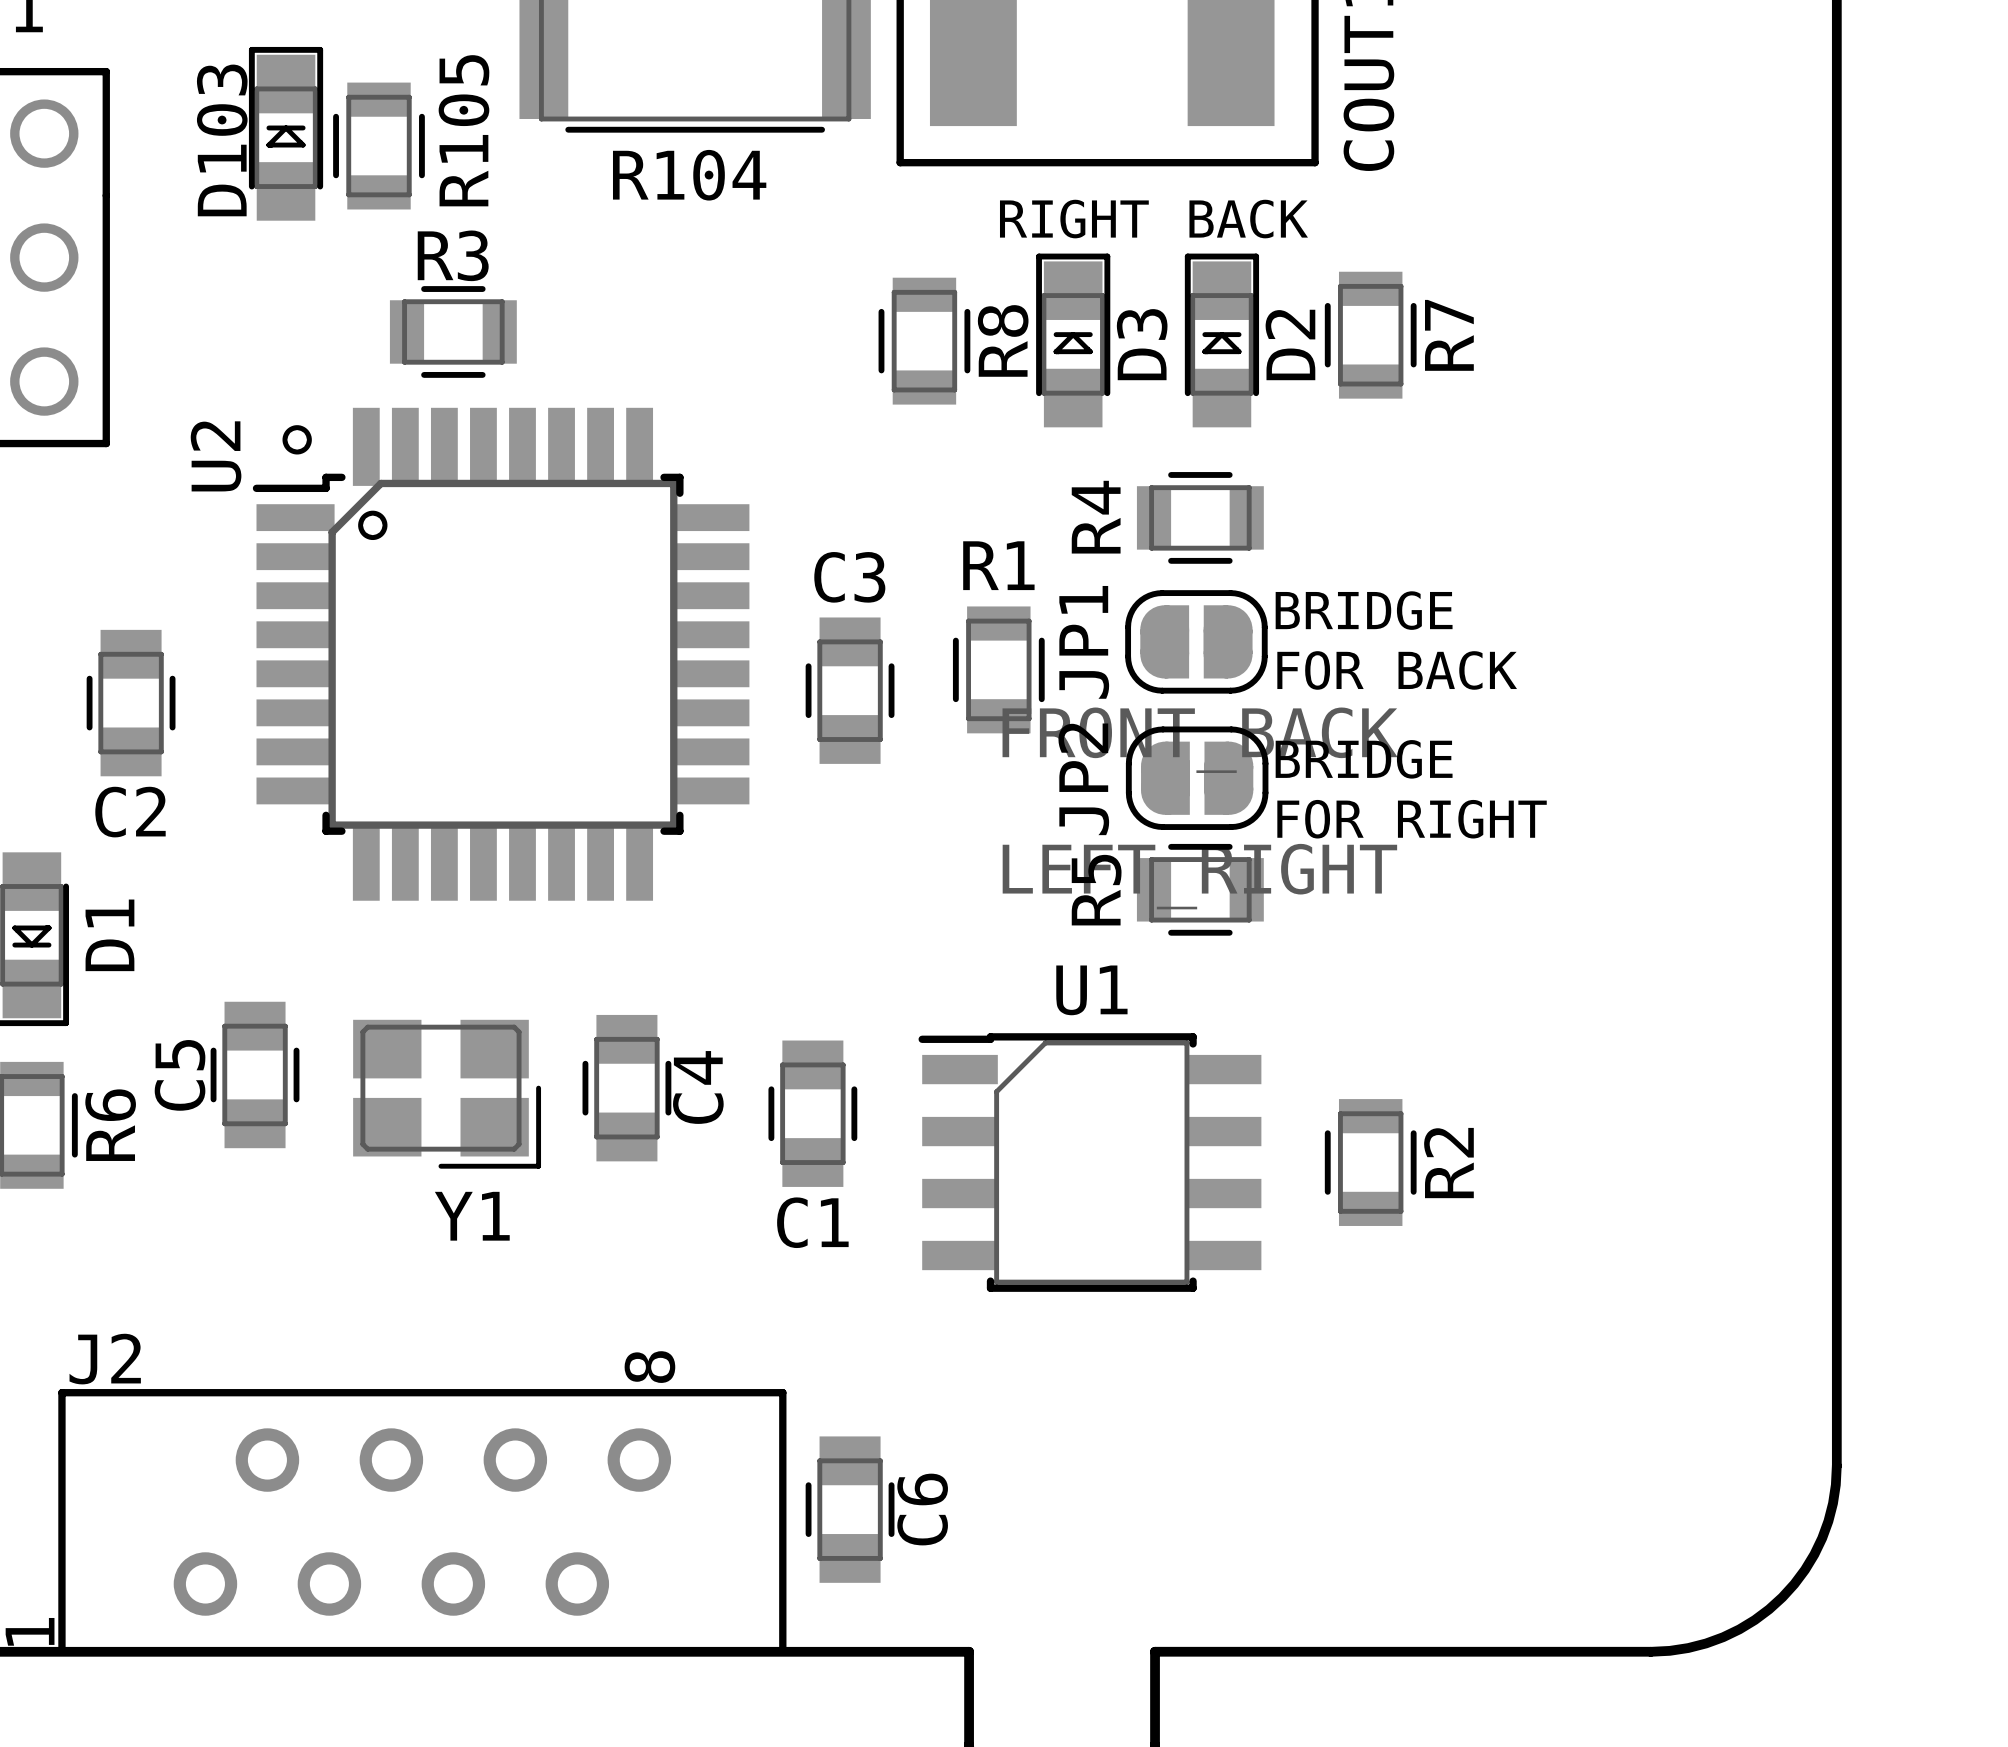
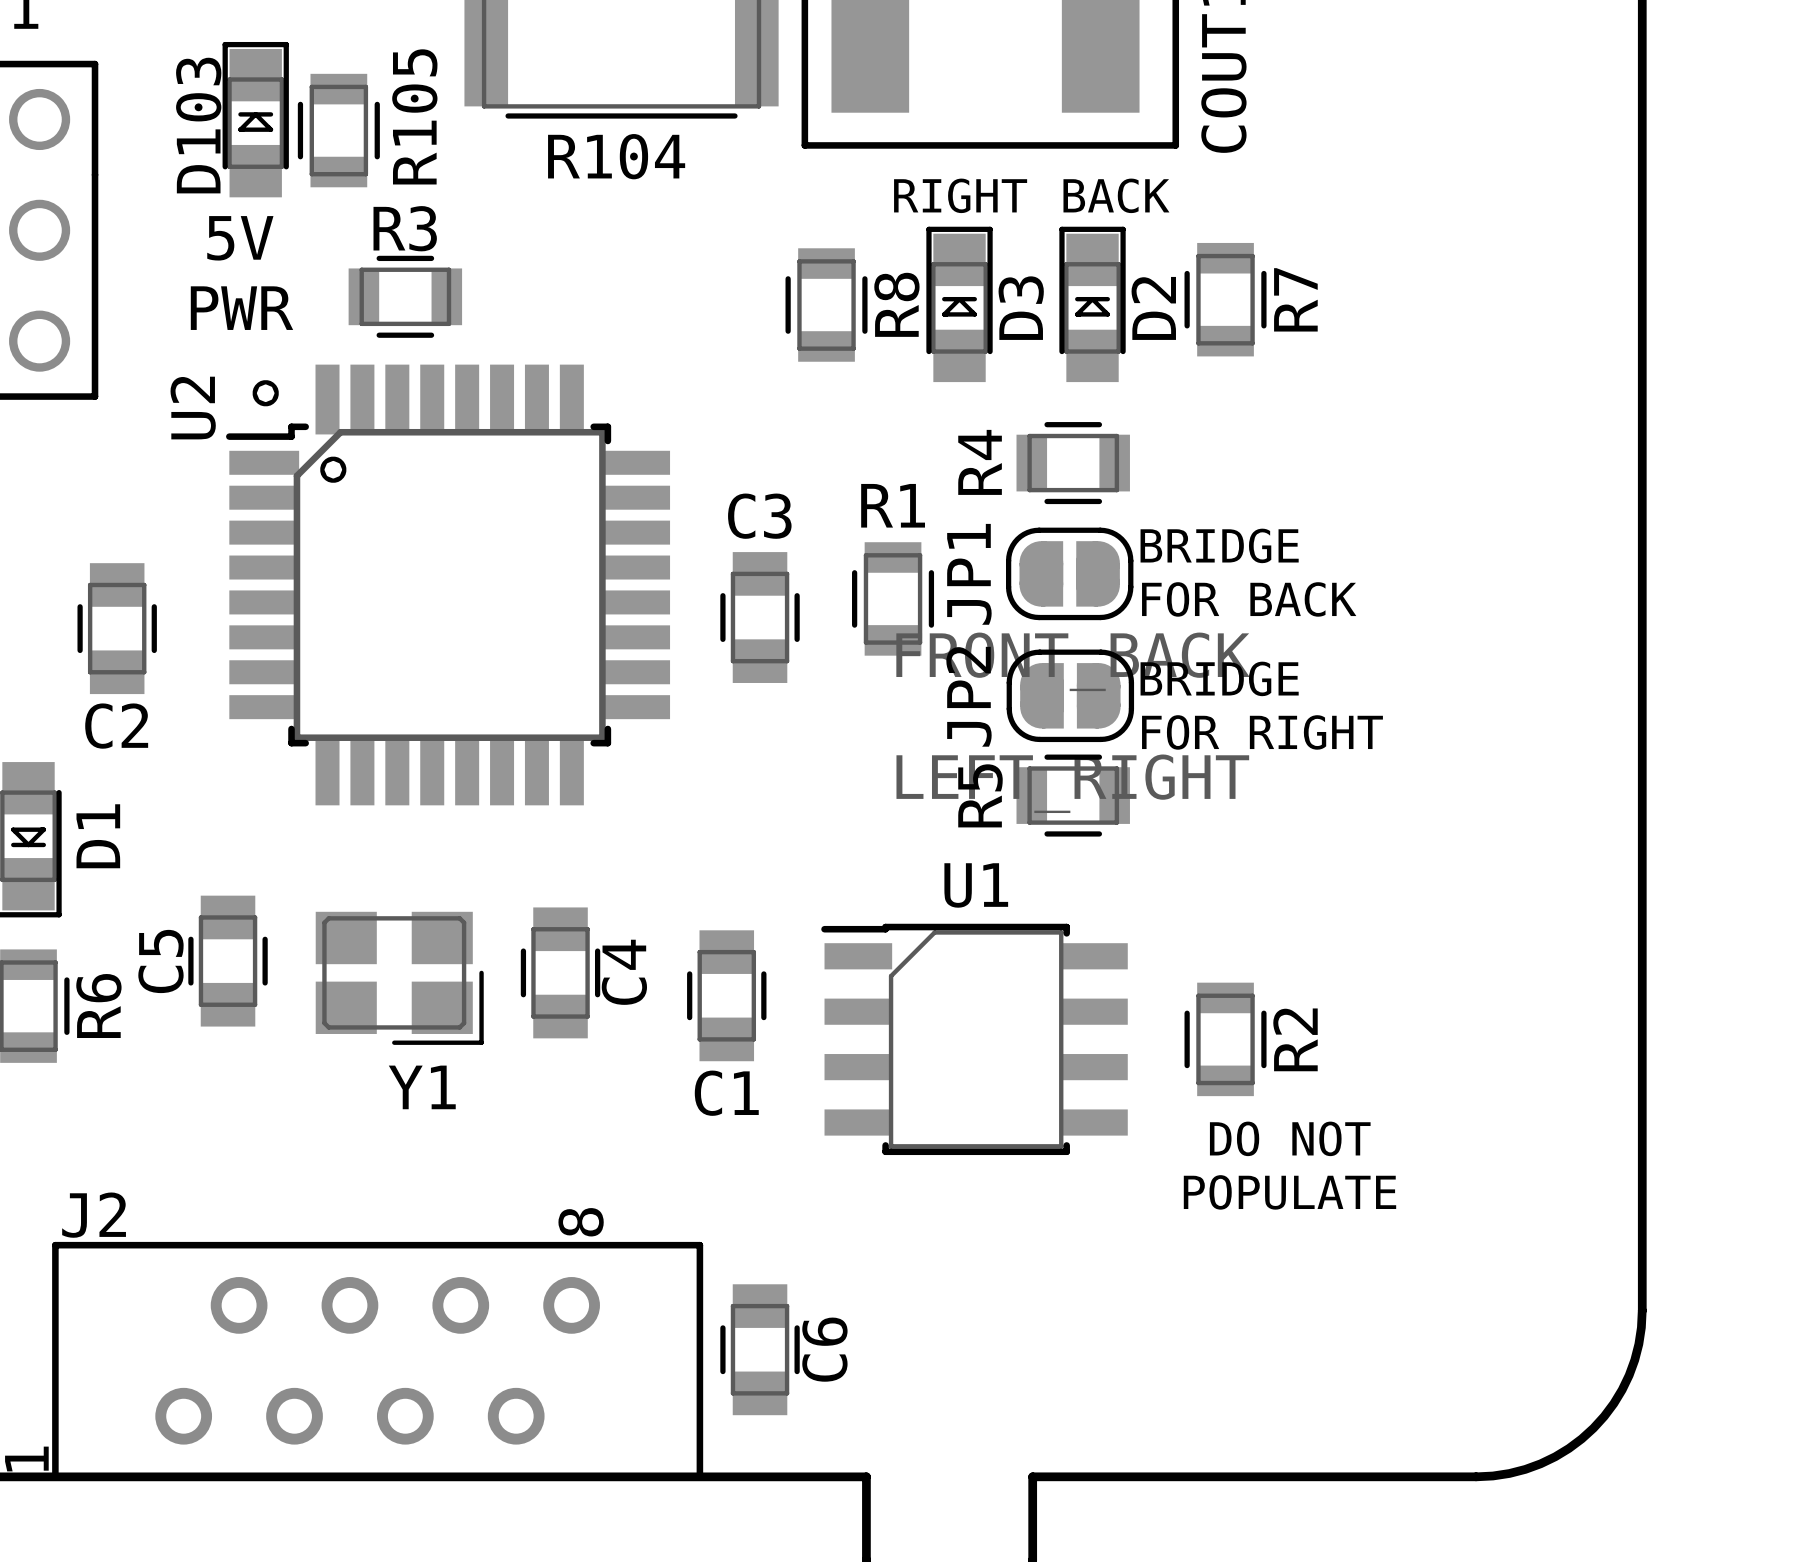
text: none -> 5V (240, 238)
text: none -> PWR (241, 308)
text: none -> DO NOT (1290, 1138)
text: none -> POPULATE (1289, 1192)

